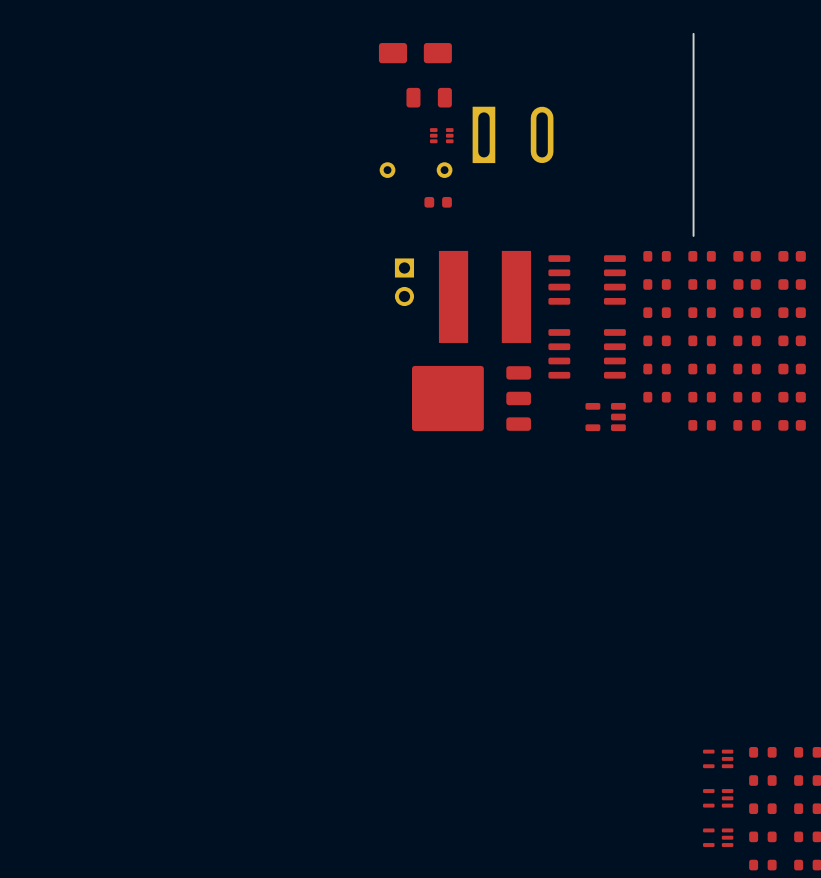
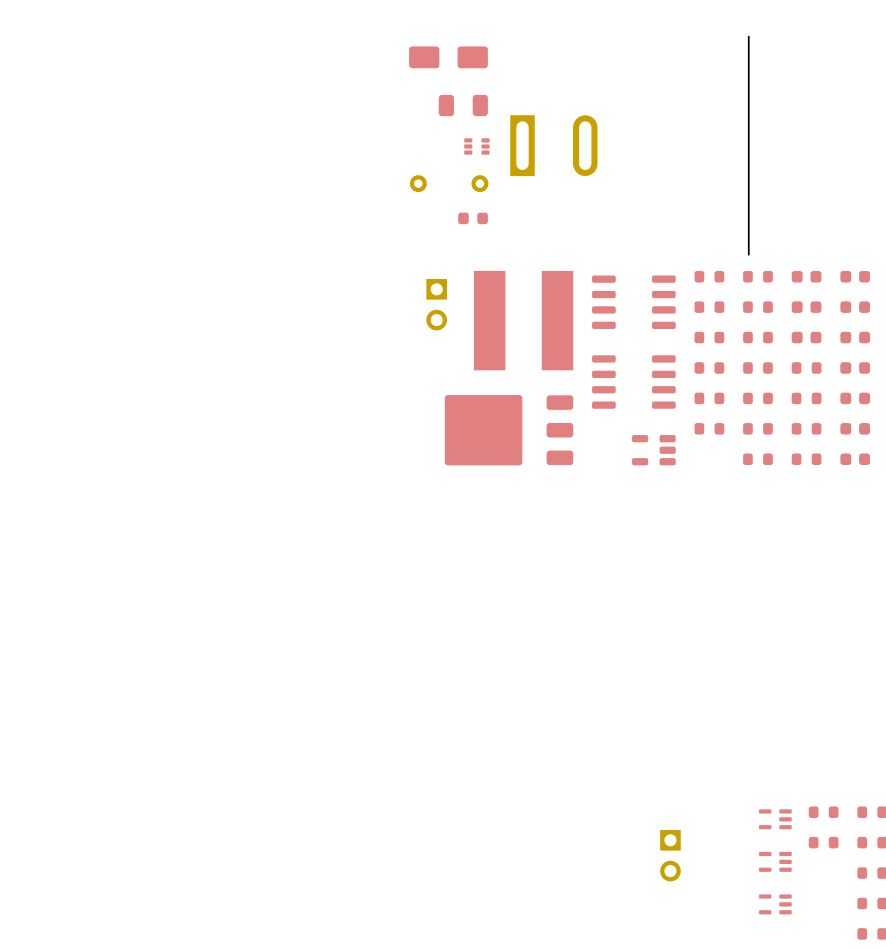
part: none -> (670, 855)
part: (762, 808) -> none
part: (762, 836) -> none
part: (762, 865) -> none

